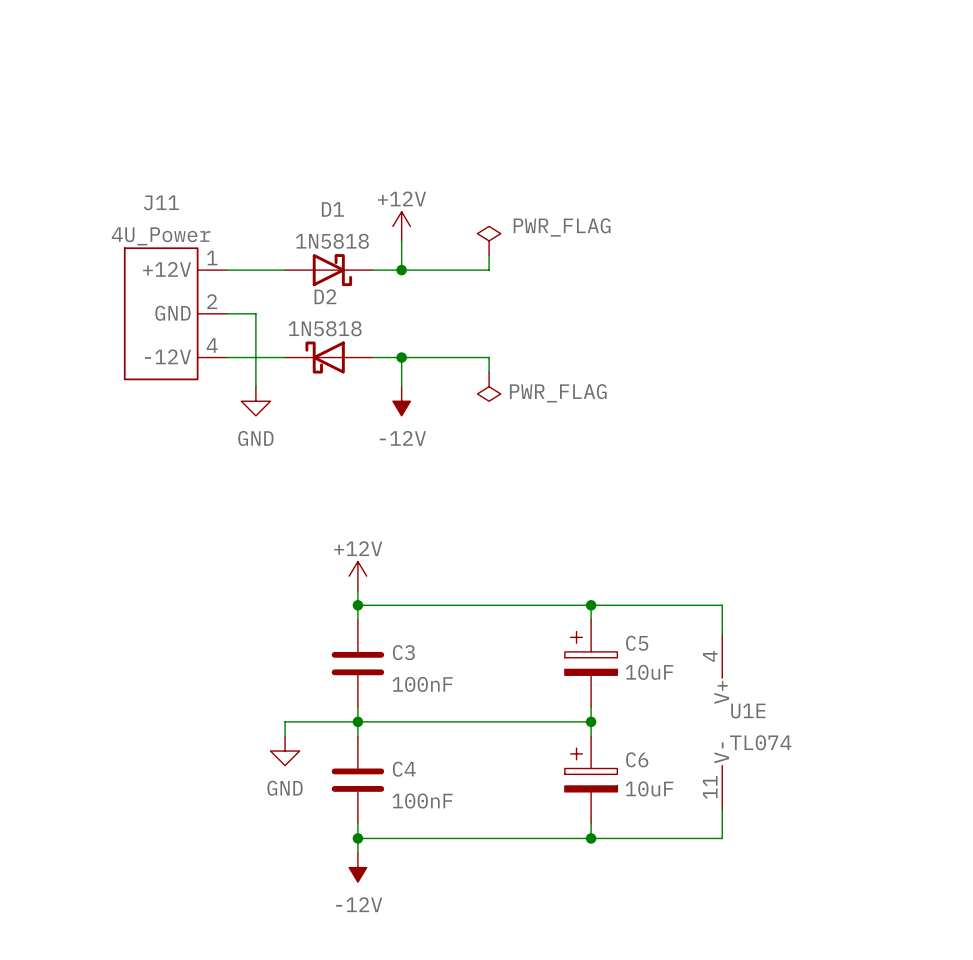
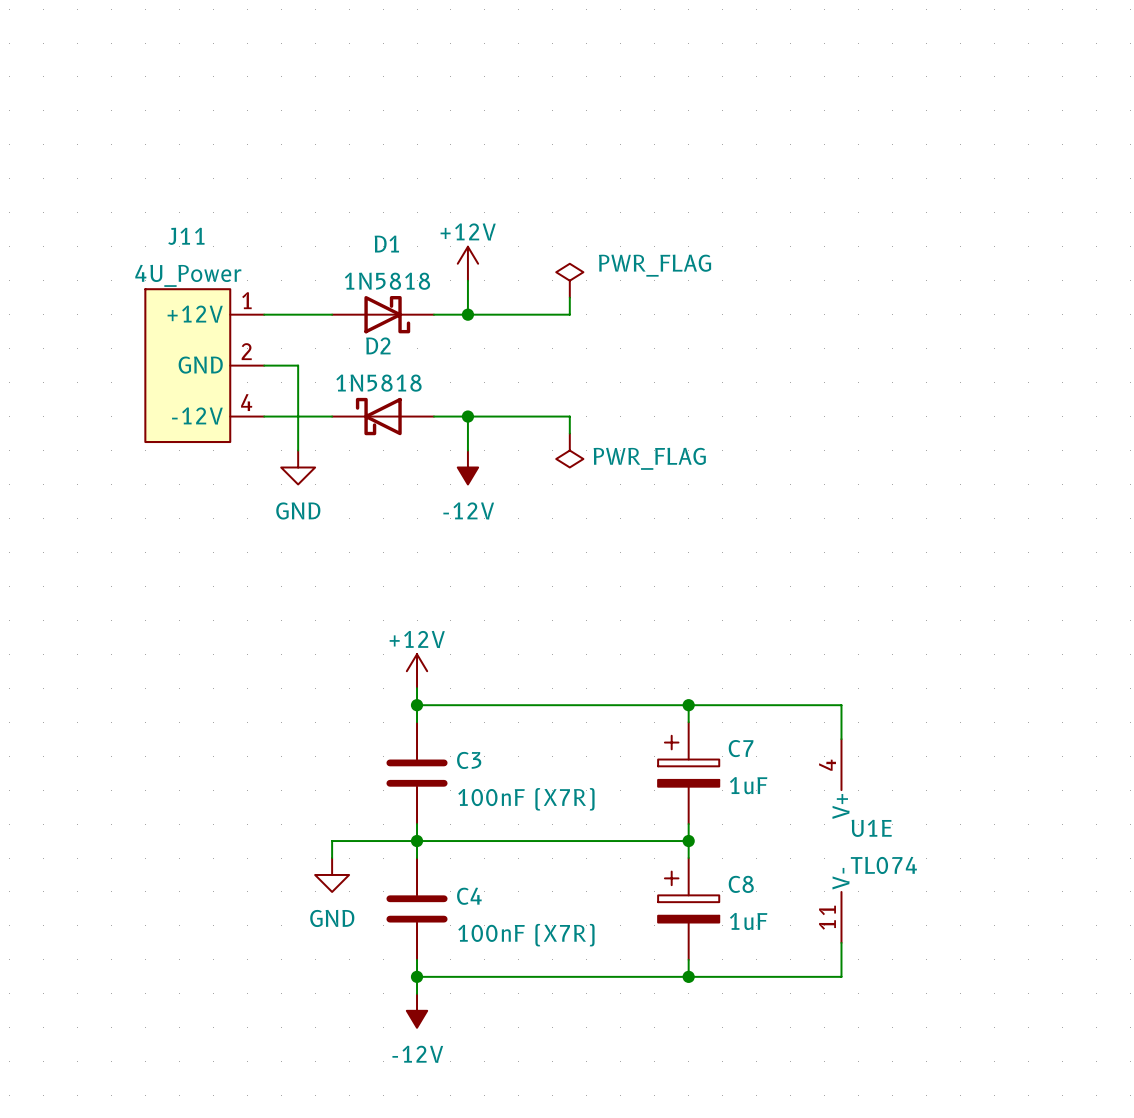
C5 name: C5 (637, 643) -> C7 (741, 748)
C5 value: 10uF (649, 672) -> 1uF (748, 785)
C3 value: 100nF (422, 684) -> 100nF (X7R) (526, 799)
C6 name: C6 (637, 759) -> C8 (741, 884)
C6 value: 10uF (649, 788) -> 1uF (748, 921)
C4 value: 100nF (422, 801) -> 100nF (X7R) (526, 935)

